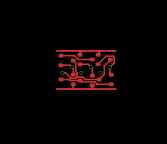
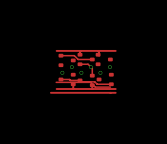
top track: (73, 60) (75, 62) (77, 76) (70, 78) (65, 72) (62, 72) -> none
top track: (111, 60) (104, 66) (104, 74) (102, 76) -> none
top track: (98, 64) (106, 56) (112, 56) (114, 62) (109, 67) (111, 74) -> none
top track: (60, 65) (69, 65) (73, 68) (73, 74) -> none
top track: (101, 76) (99, 79) (76, 77) -> none
top track: none -> (56, 82) (90, 82) (95, 87) (110, 87)
top track: none -> (115, 92) (50, 92)

